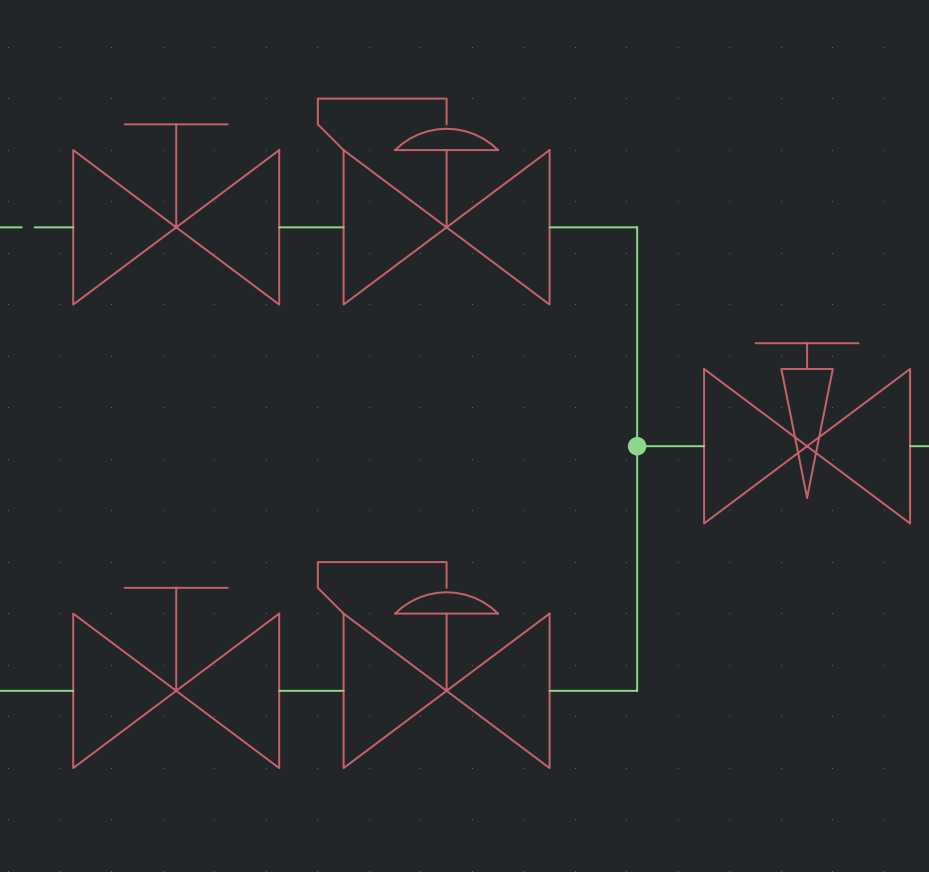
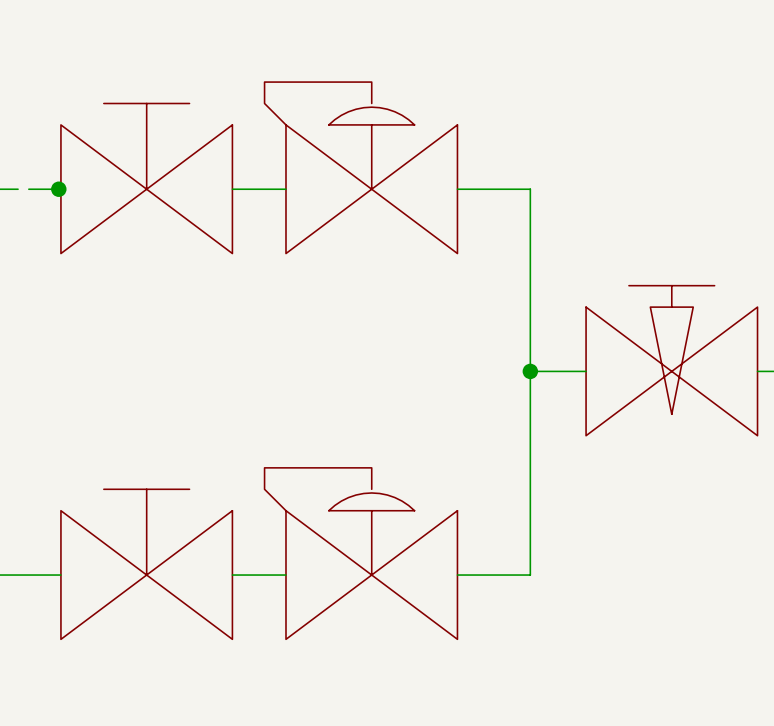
junction: none -> (58, 189)

